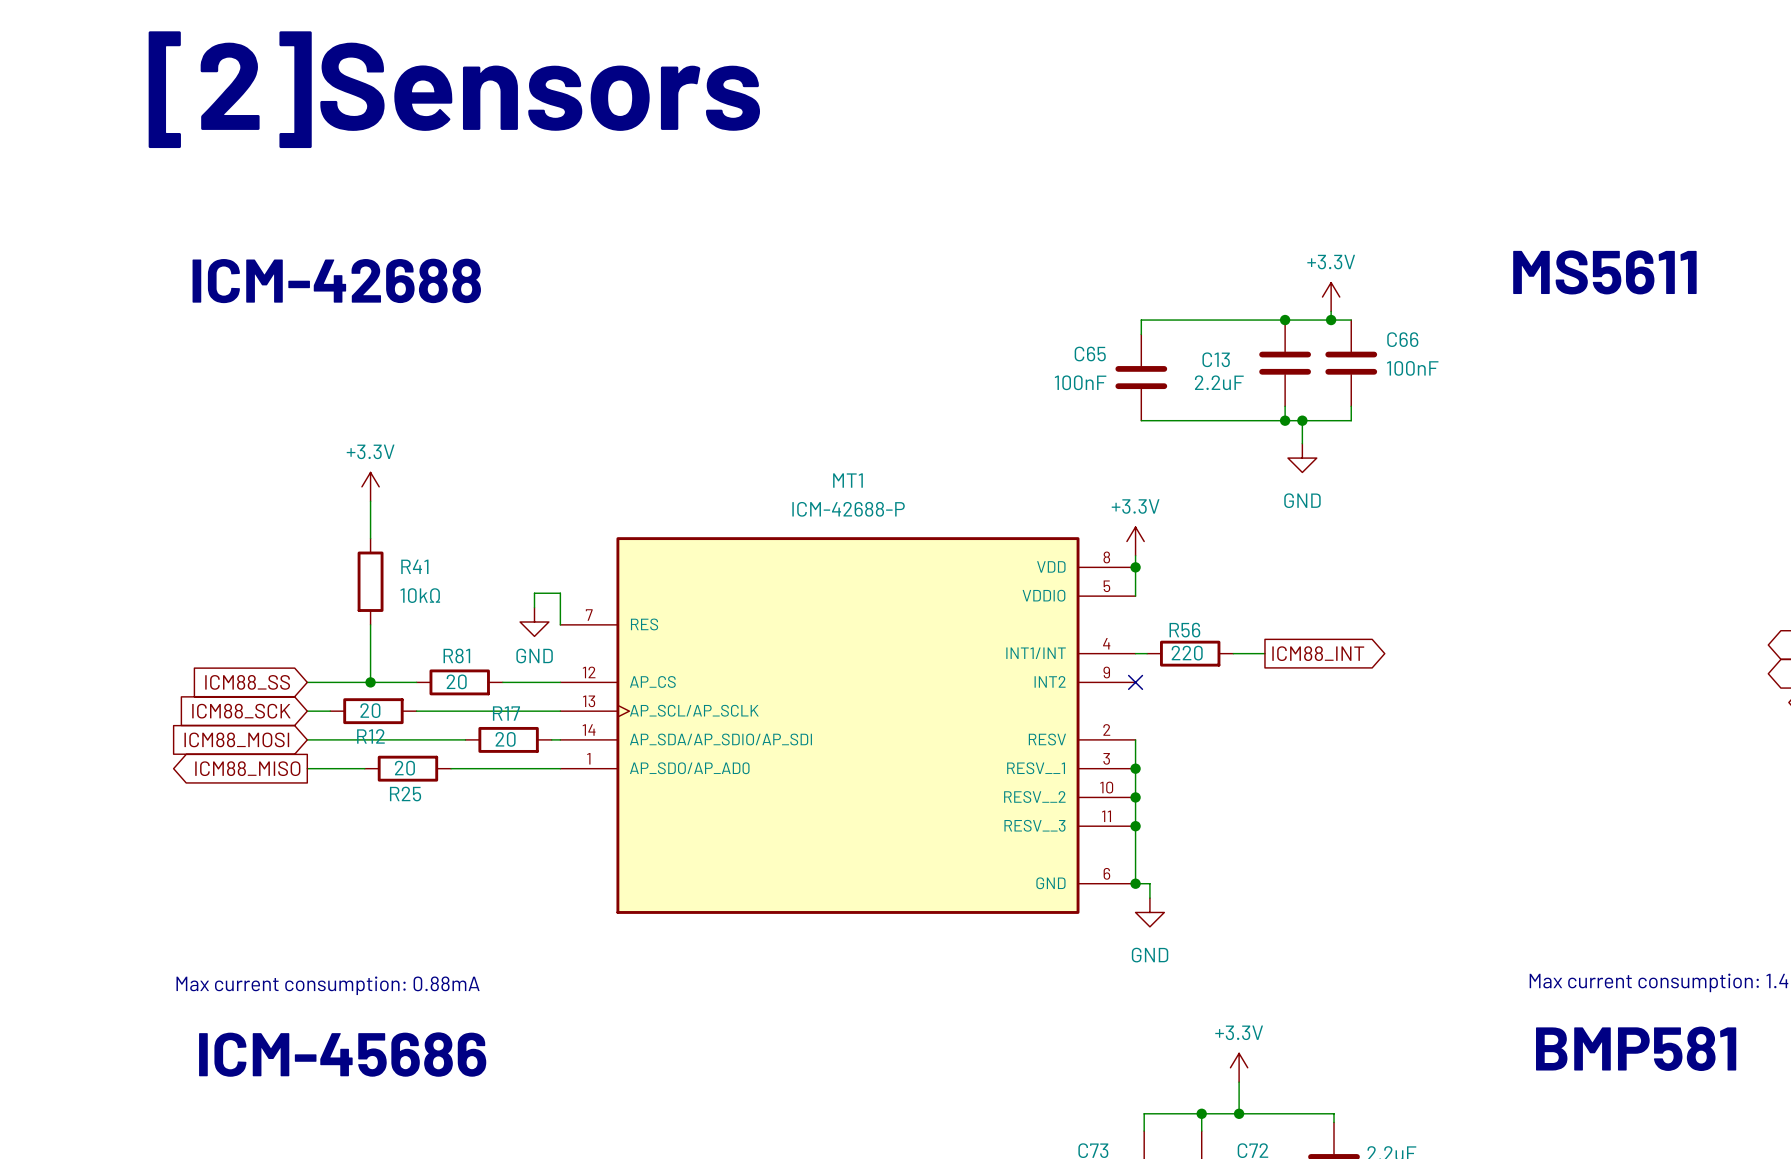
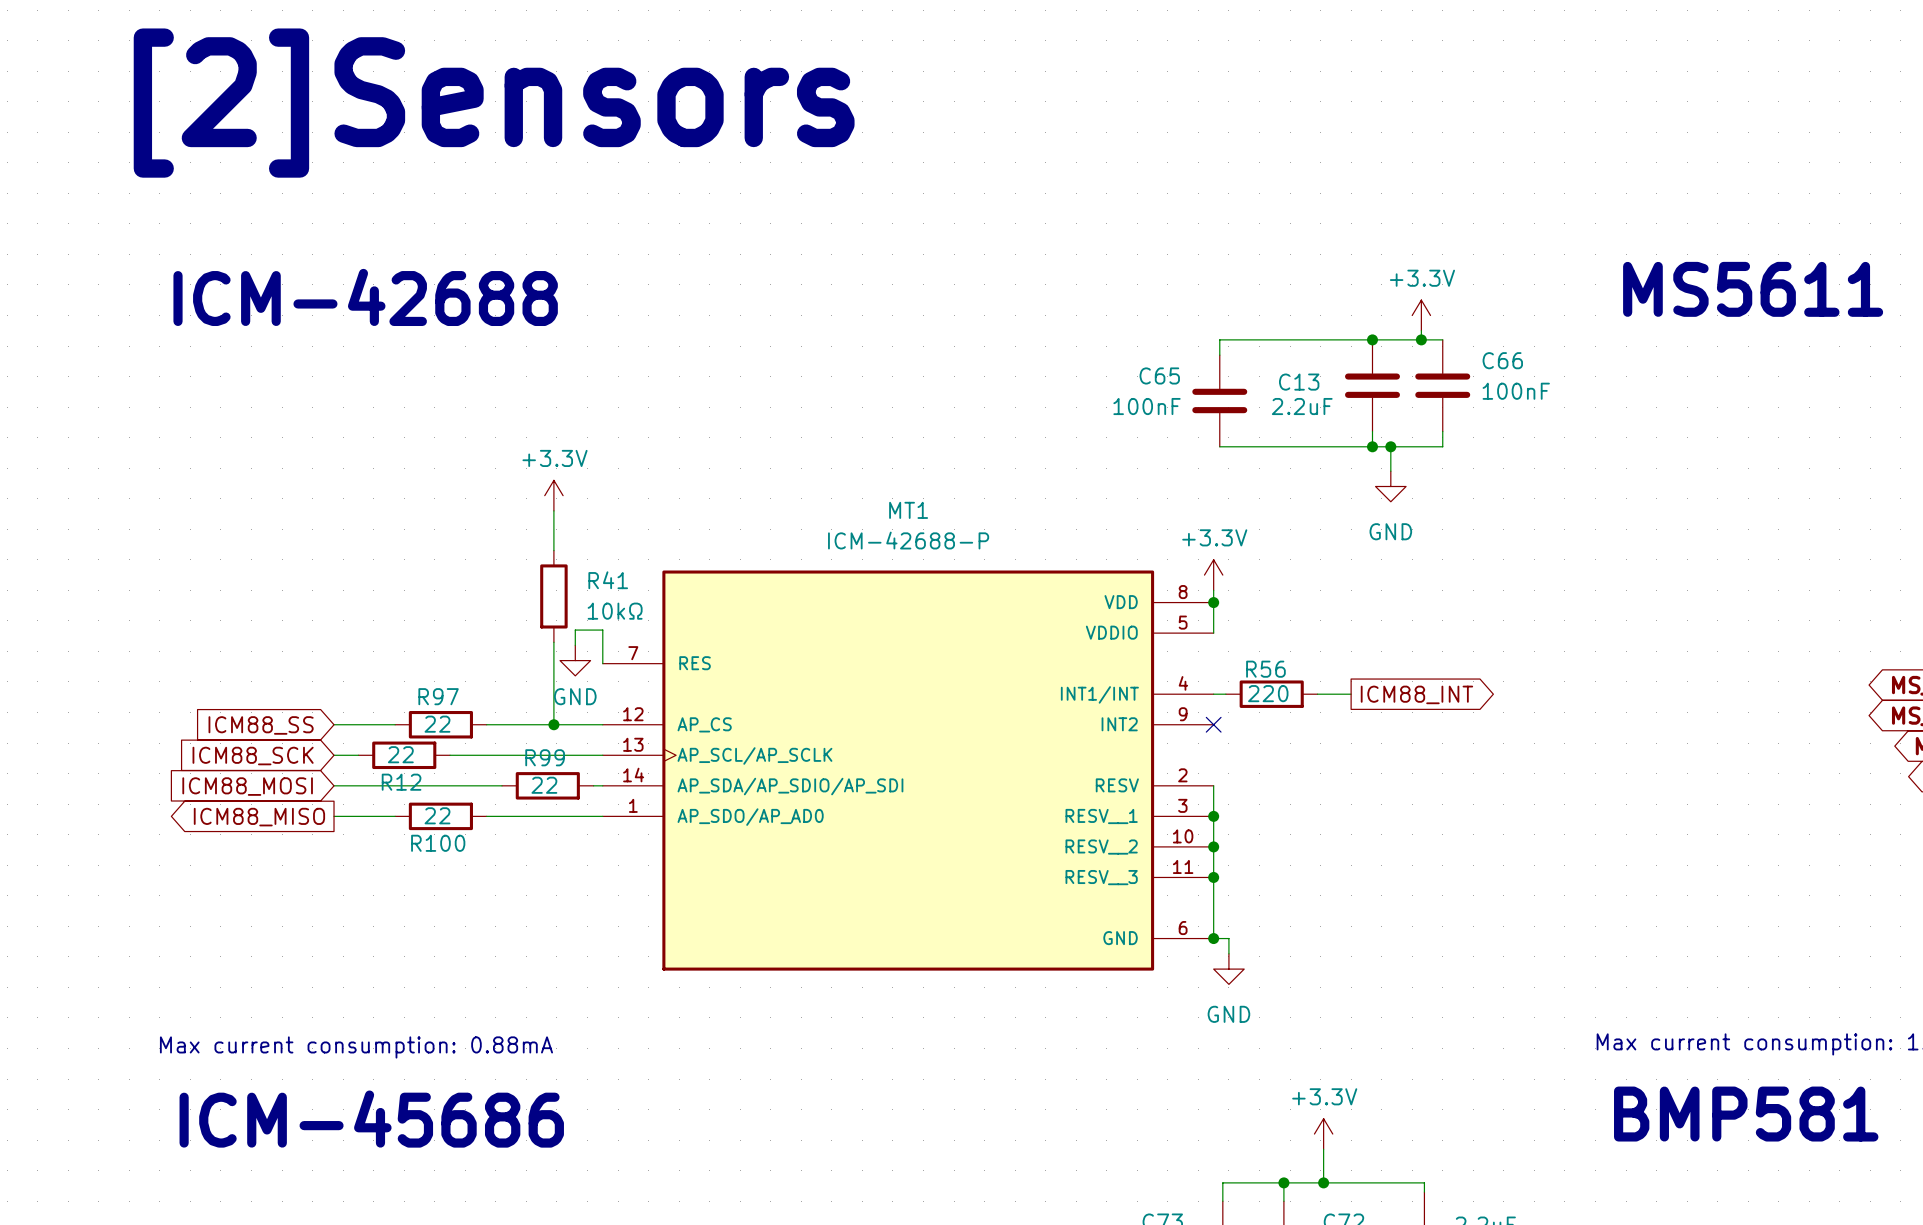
power symbol position: +3.3V (370, 486) -> +3.3V (553, 495)
wire: (370, 501) (370, 538) -> (553, 510) (553, 550)
R41 position: (370, 581) -> (553, 596)
wire: none -> (553, 642) (553, 724)
wire: (370, 624) (370, 682) -> none
wire: (364, 682) (416, 682) -> (486, 724) (541, 724)
junction: (370, 682) -> none
R97: none -> 22 (440, 724)
R81: 20 (459, 682) -> none
junction: none -> (553, 724)
R12 value: 20 (370, 710) -> 22 (400, 754)
R17 name: R17 (506, 713) -> R99 (545, 757)
R17 value: 20 (505, 739) -> 22 (544, 785)
R25 value: 20 (404, 768) -> 22 (437, 815)
R25 name: R25 (405, 794) -> R100 (438, 843)

